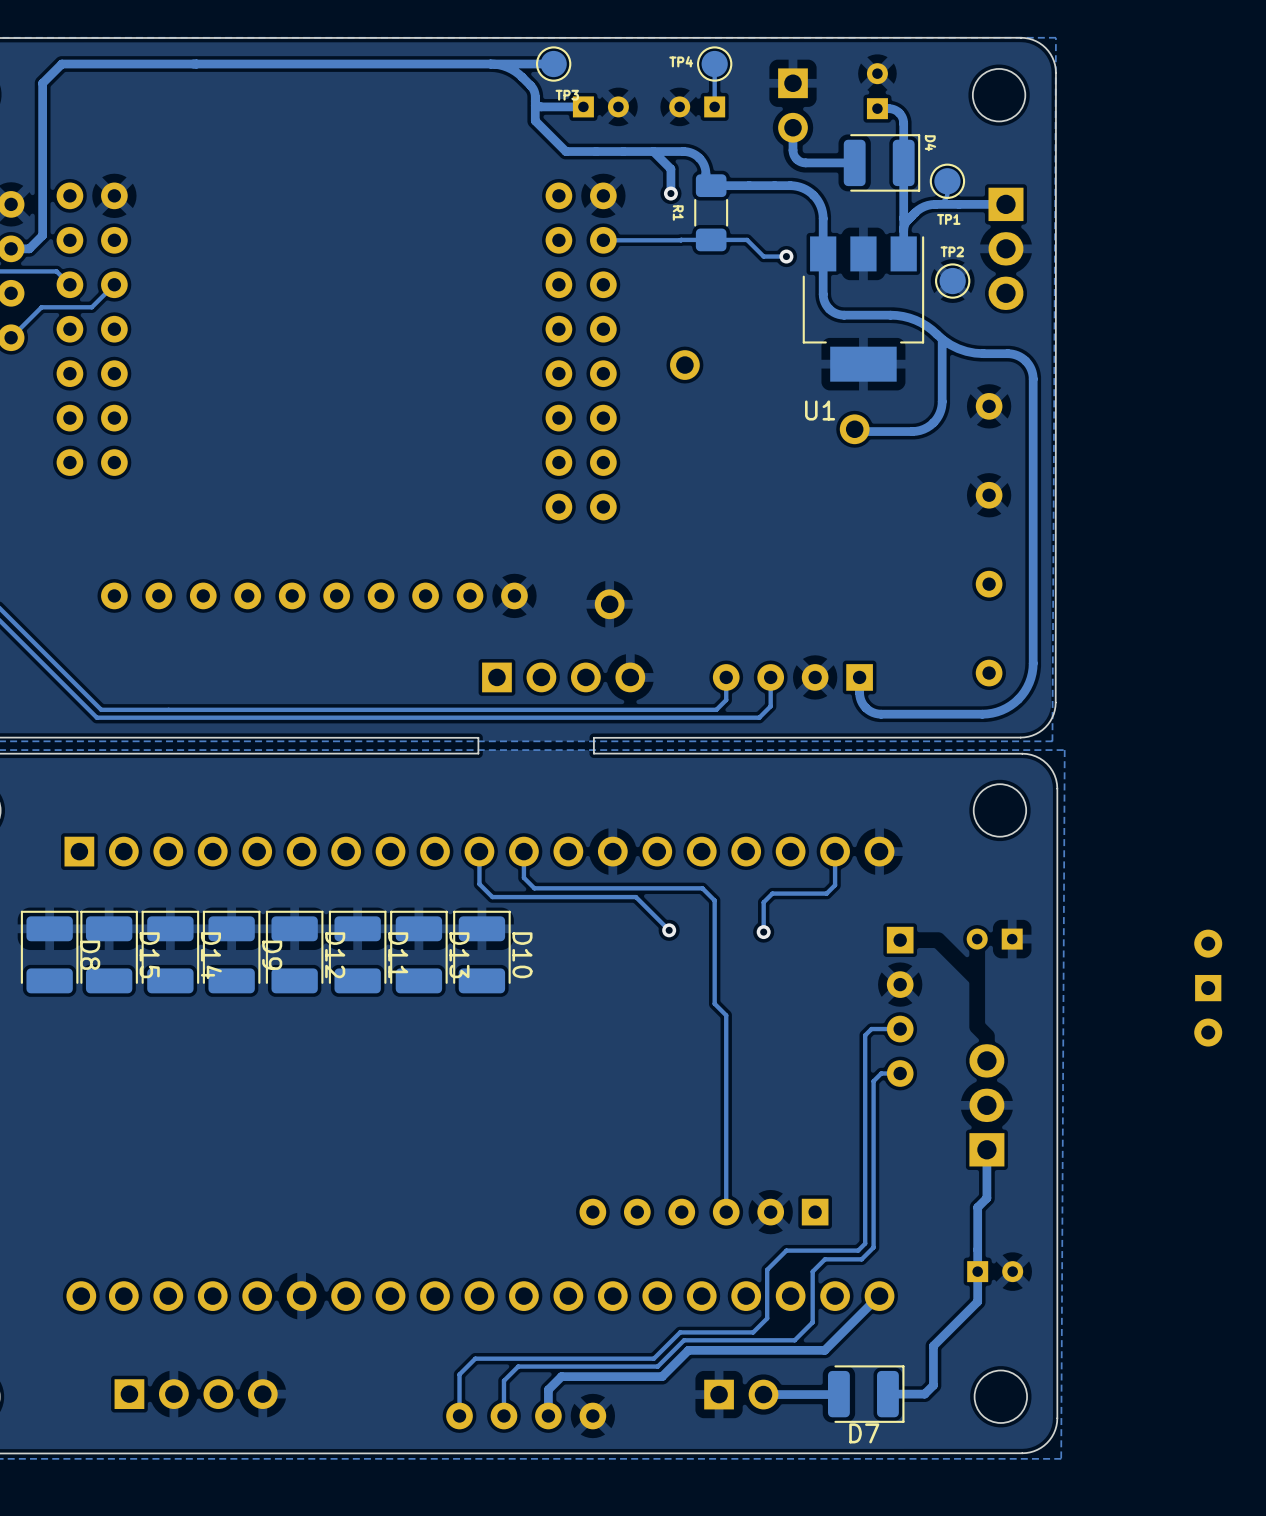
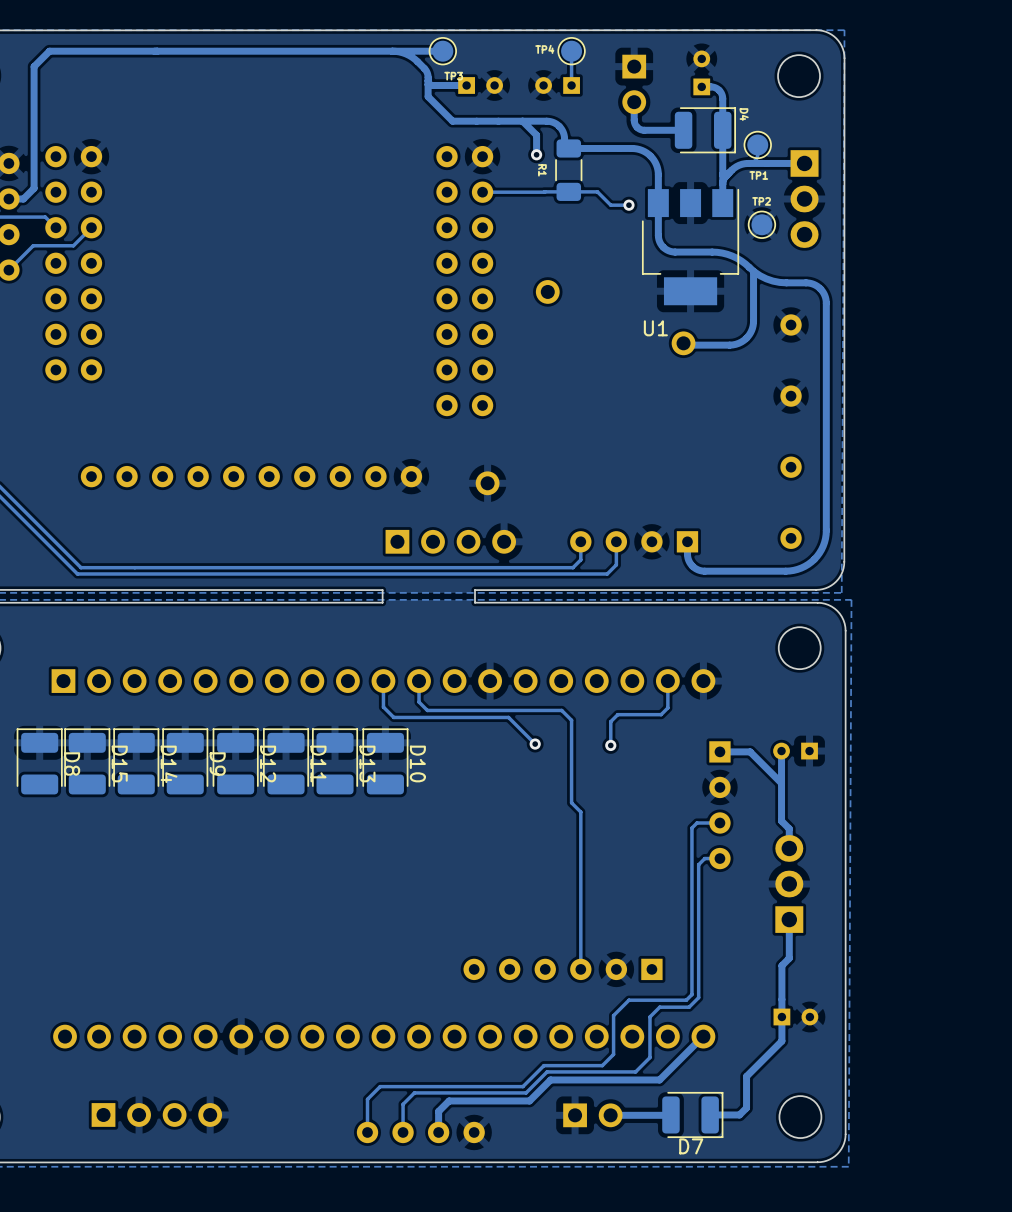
track: none -> (781, 751) (781, 821) (789, 828) (789, 848)
track: none -> (719, 751) (750, 751) (781, 783)
part: (1208, 988) -> none

